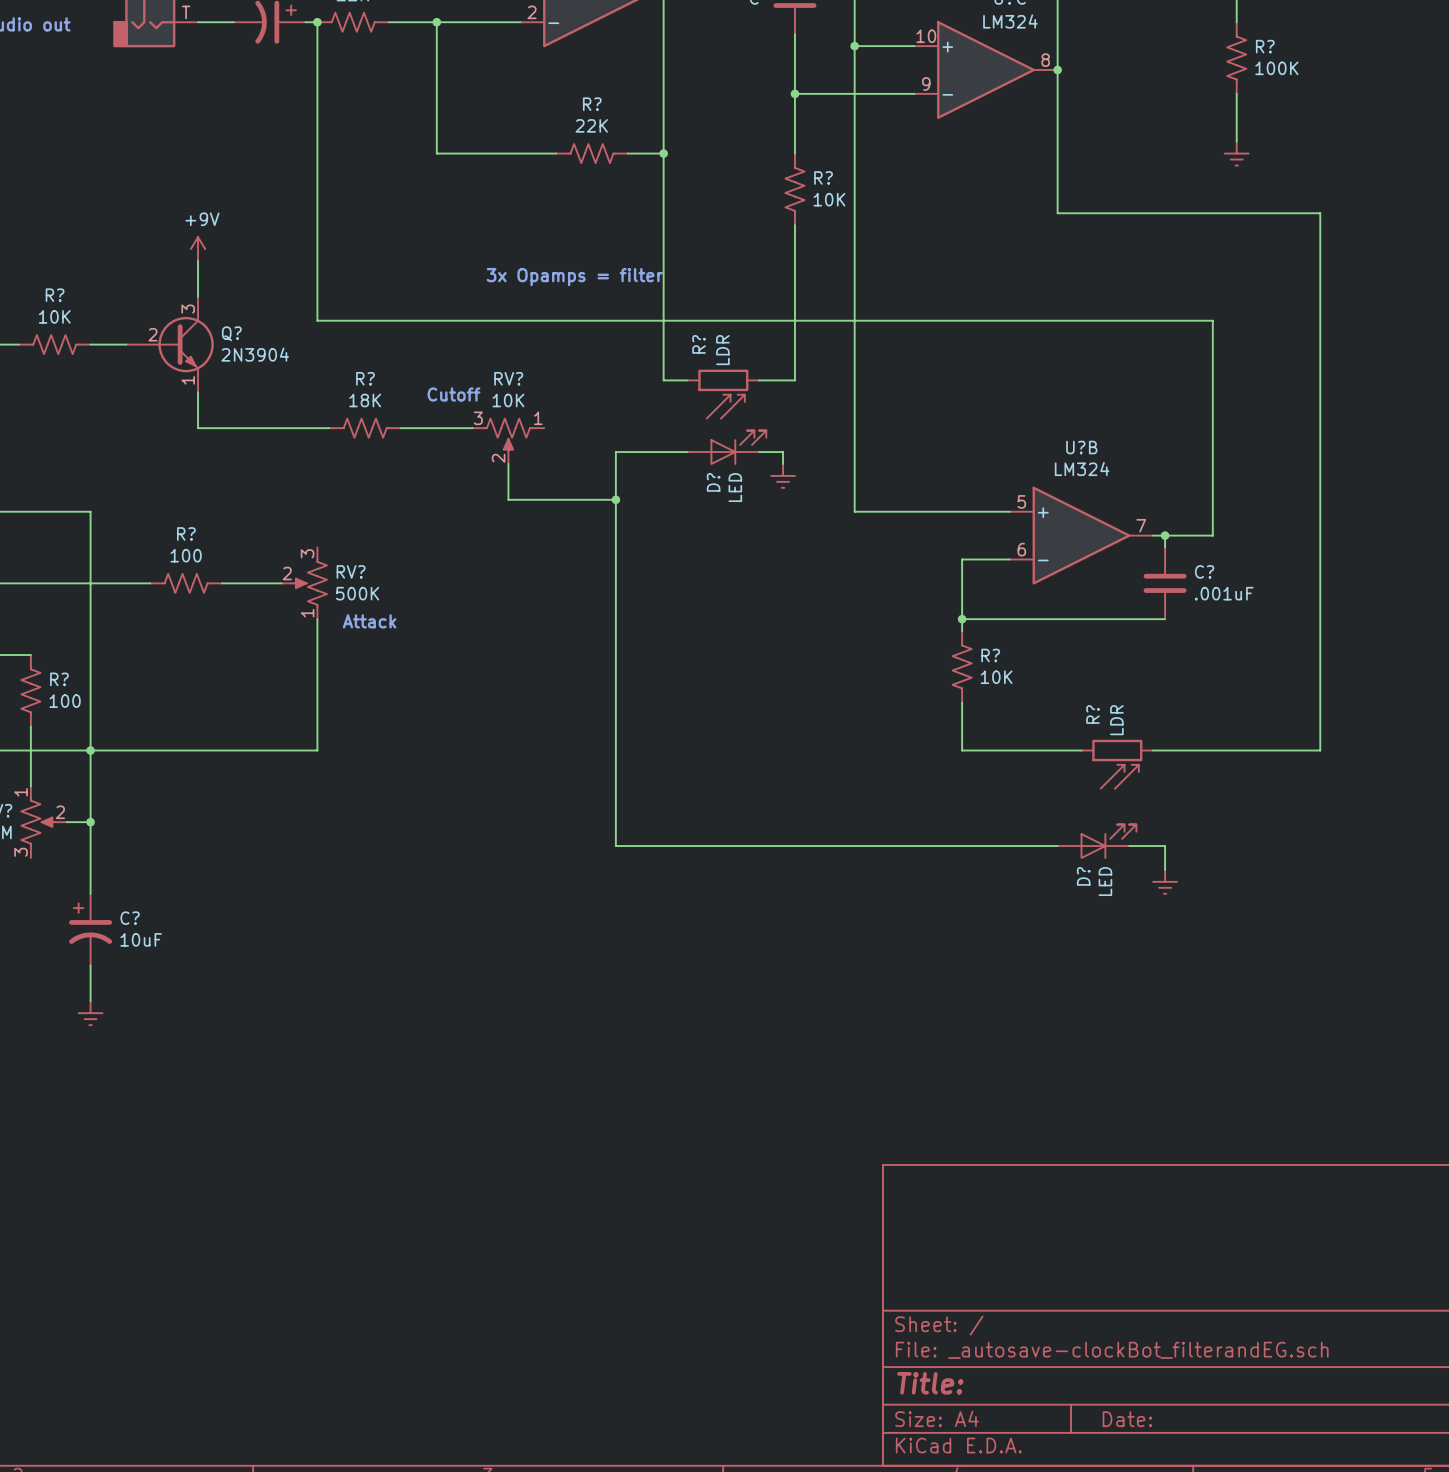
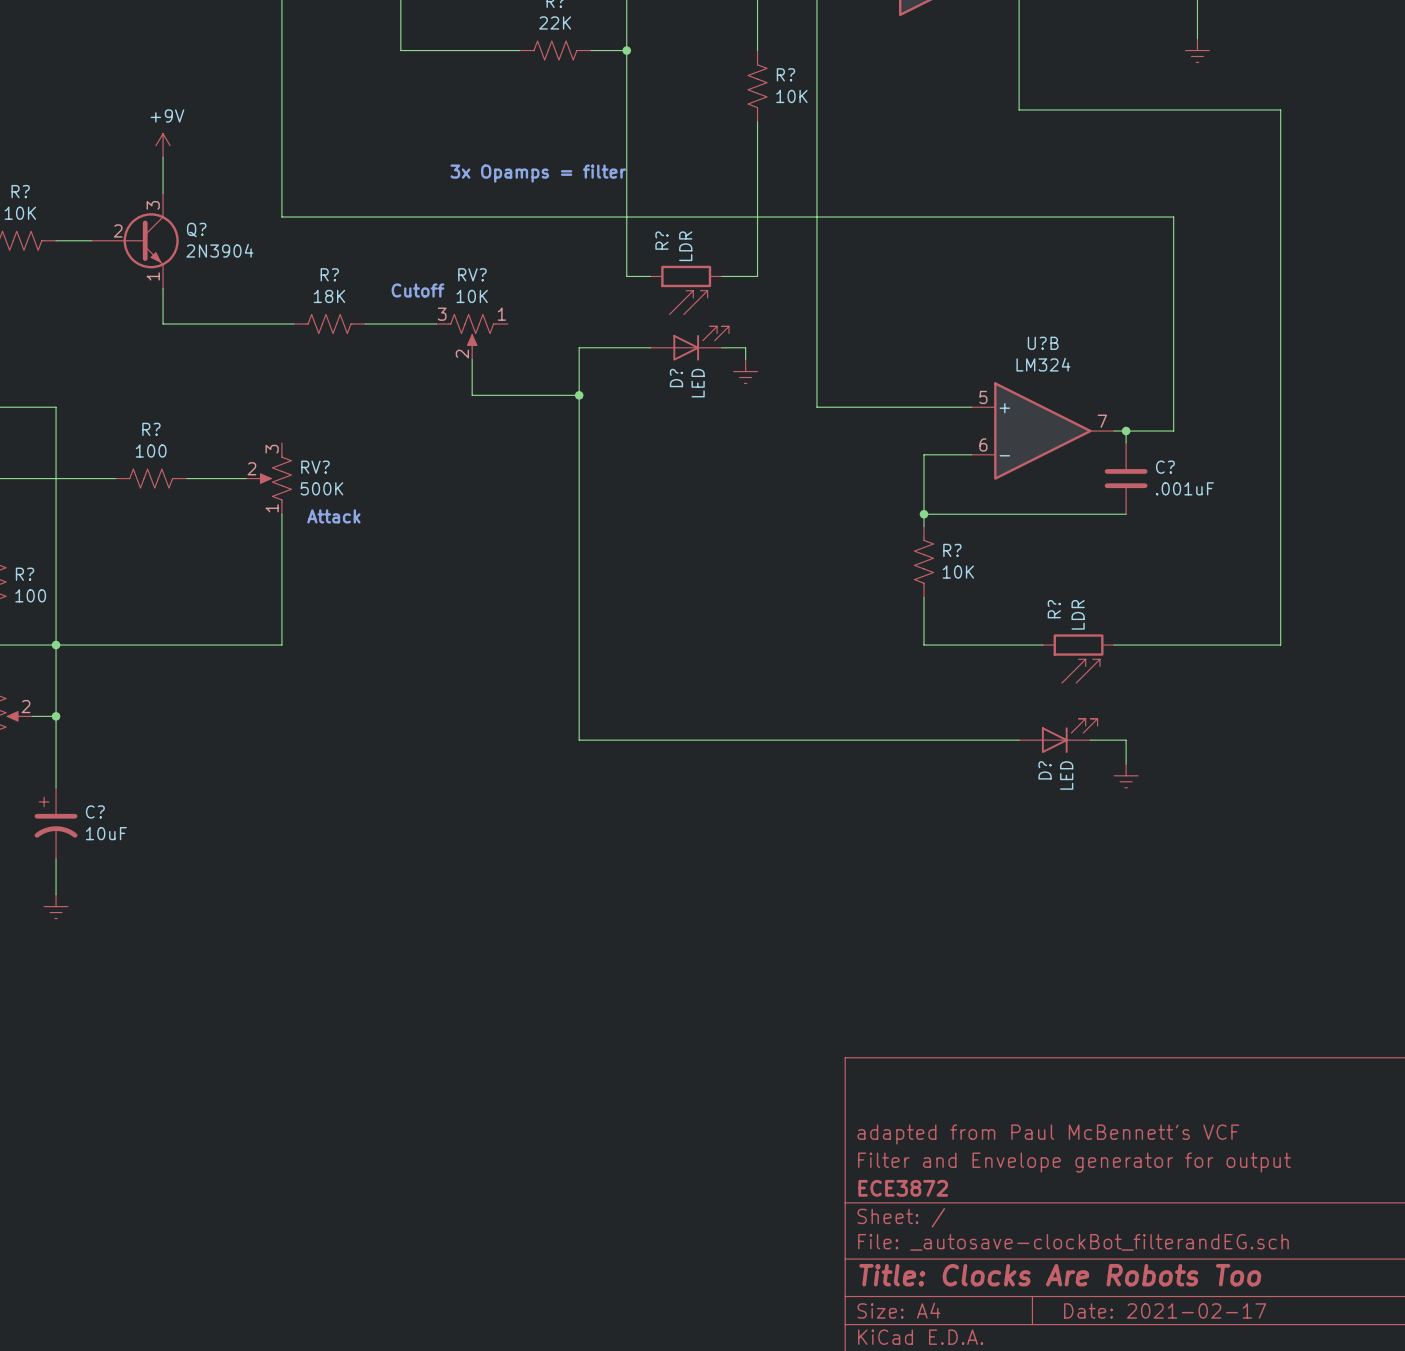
title block: none -> adapted from Paul McBennett's VCF (1048, 1134)
title block: none -> Filter and Envelope generator for output (1074, 1162)
title block: none -> ECE3872 (903, 1188)
title block: Title: (930, 1383) -> Title: Clocks Are Robots Too (1060, 1275)
title block: Date: (1127, 1419) -> Date: 2021-02-17 (1165, 1310)

